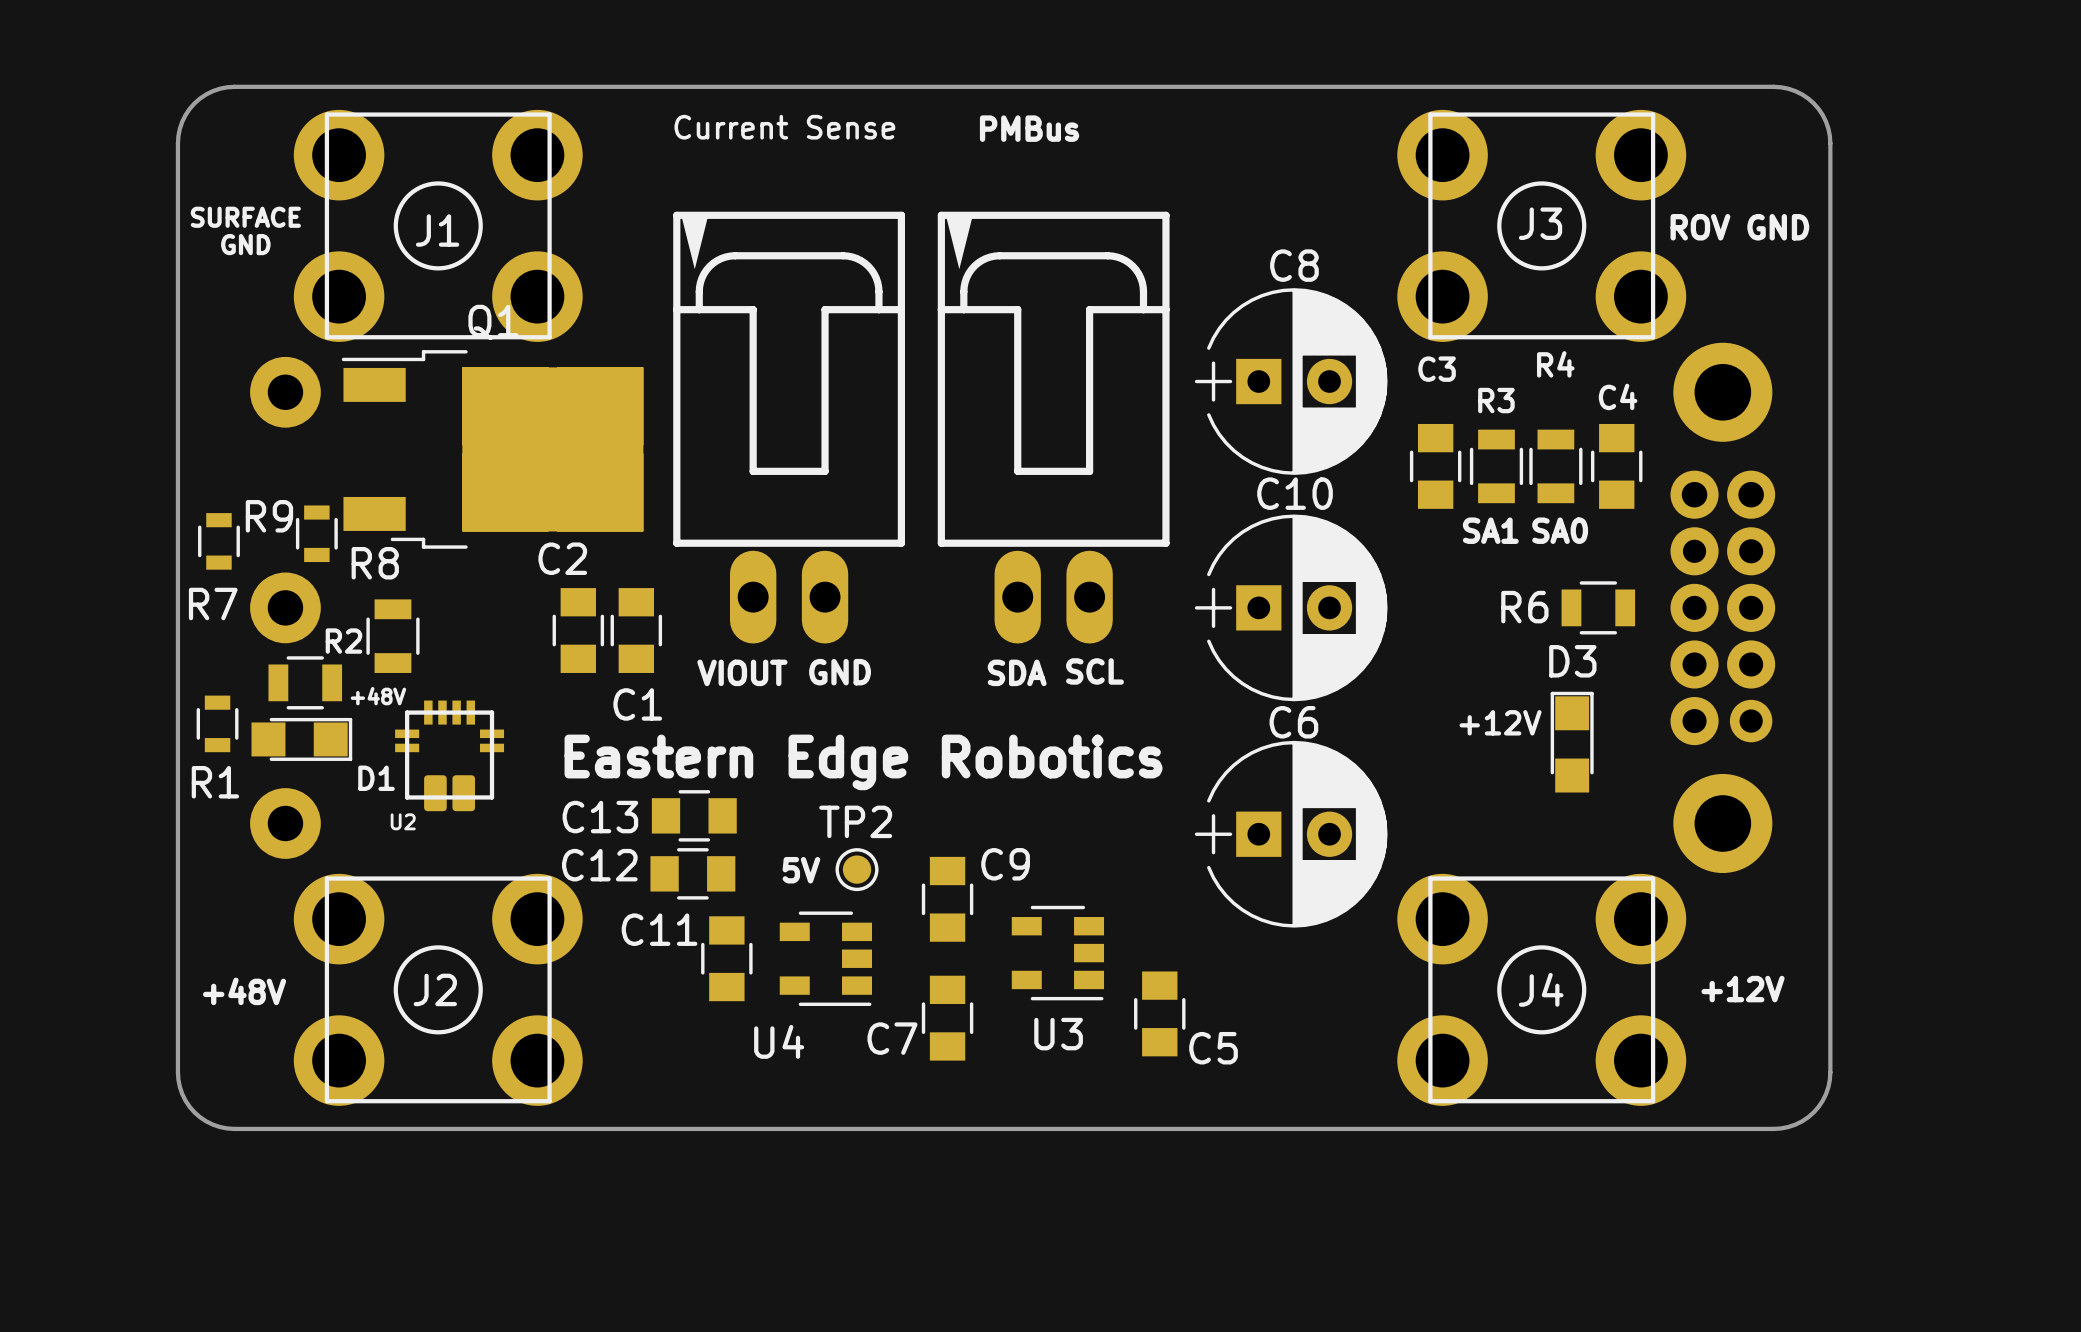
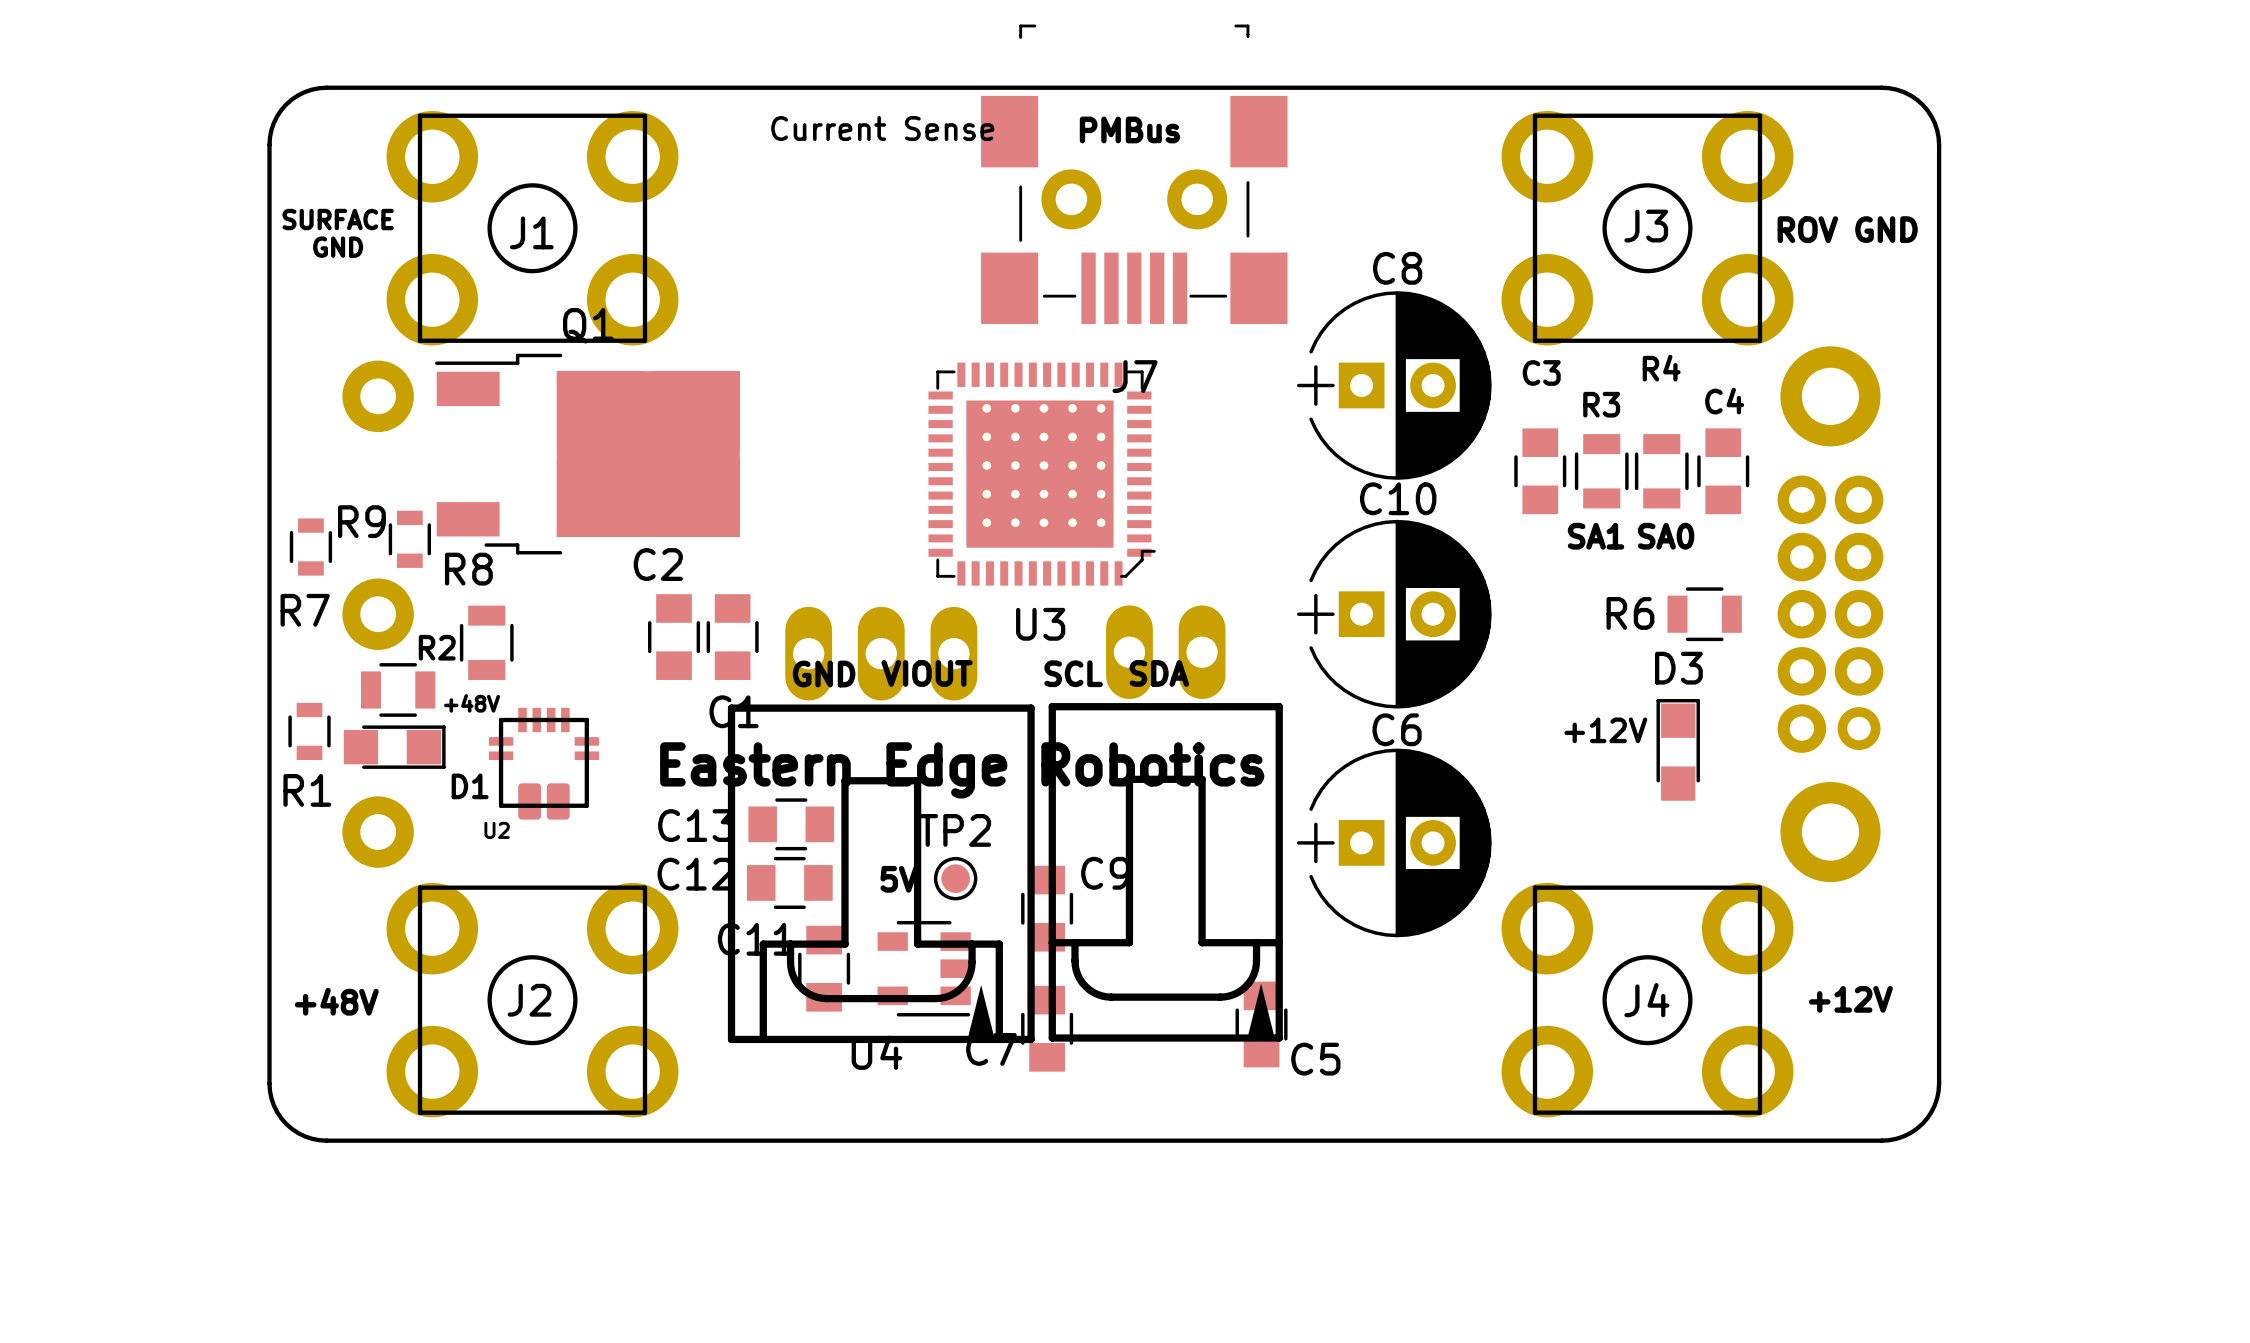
J7: none -> (1134, 174)
part: (789, 427) -> none
part: (1053, 427) -> none
text position: SCL (1094, 671) -> SCL (1073, 673)
text: VIOUT (742, 672) -> GND (824, 674)
text: GND (840, 672) -> VIOUT (927, 673)
text position: SDA (1017, 672) -> SDA (1159, 673)
part: none -> (1165, 823)
part: none -> (881, 824)
U3 footprint: [1011, 905, 1105, 1001] -> [928, 362, 1156, 586]
U3 name position: U3 (1058, 1034) -> U3 (1040, 624)

